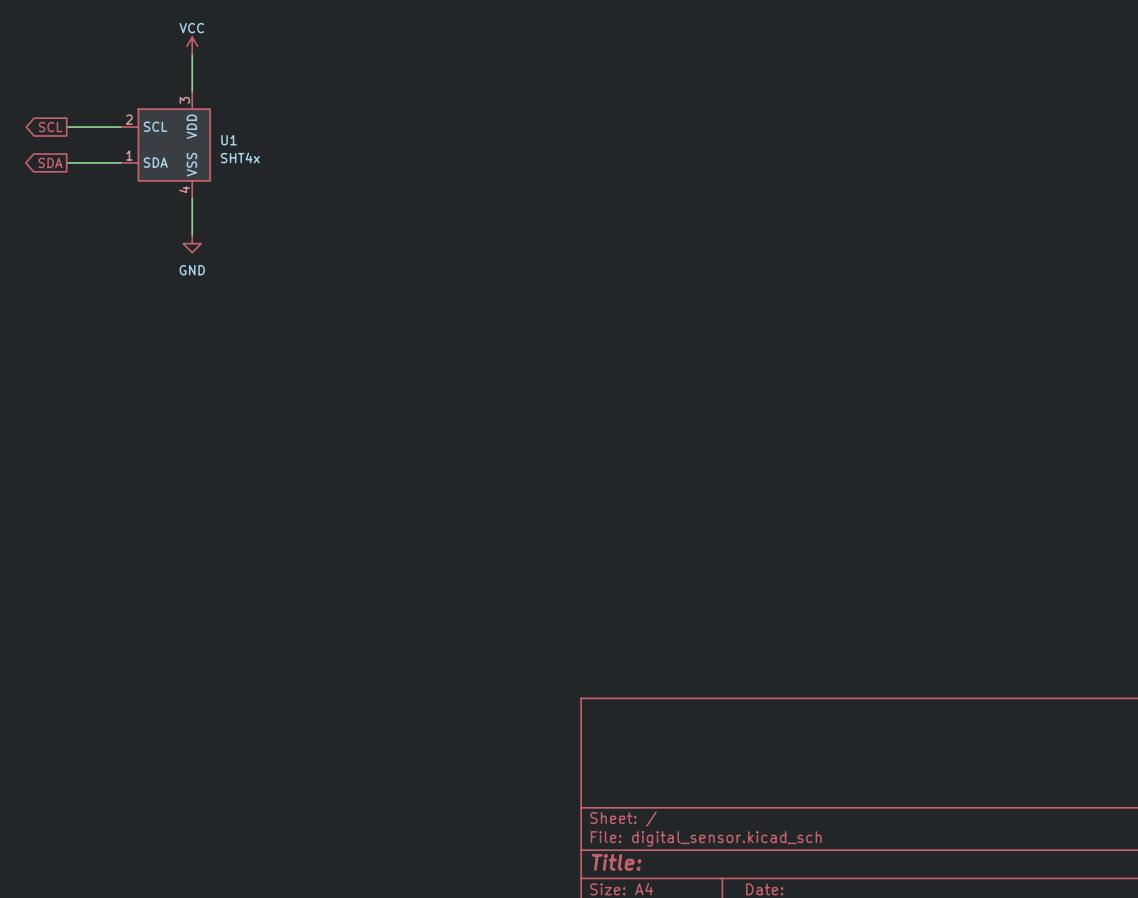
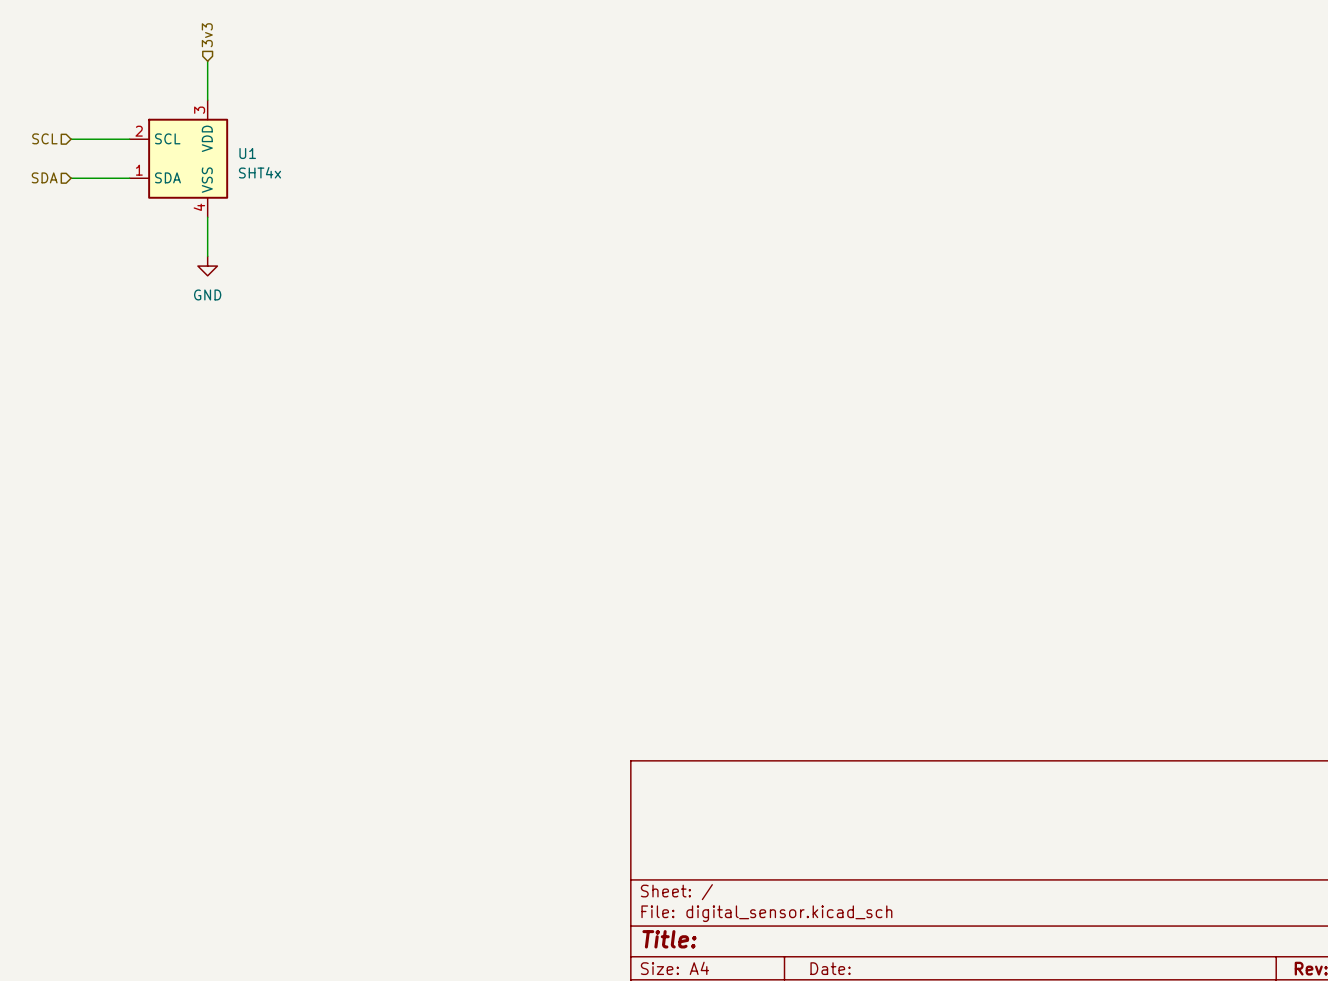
hierarchical label: none -> 3v3 (207, 35)
power symbol: VCC (192, 46) -> none
hierarchical label: none -> SCL (44, 138)
global label: SCL (50, 127) -> none
hierarchical label: none -> SDA (44, 177)
global label: SDA (50, 162) -> none

